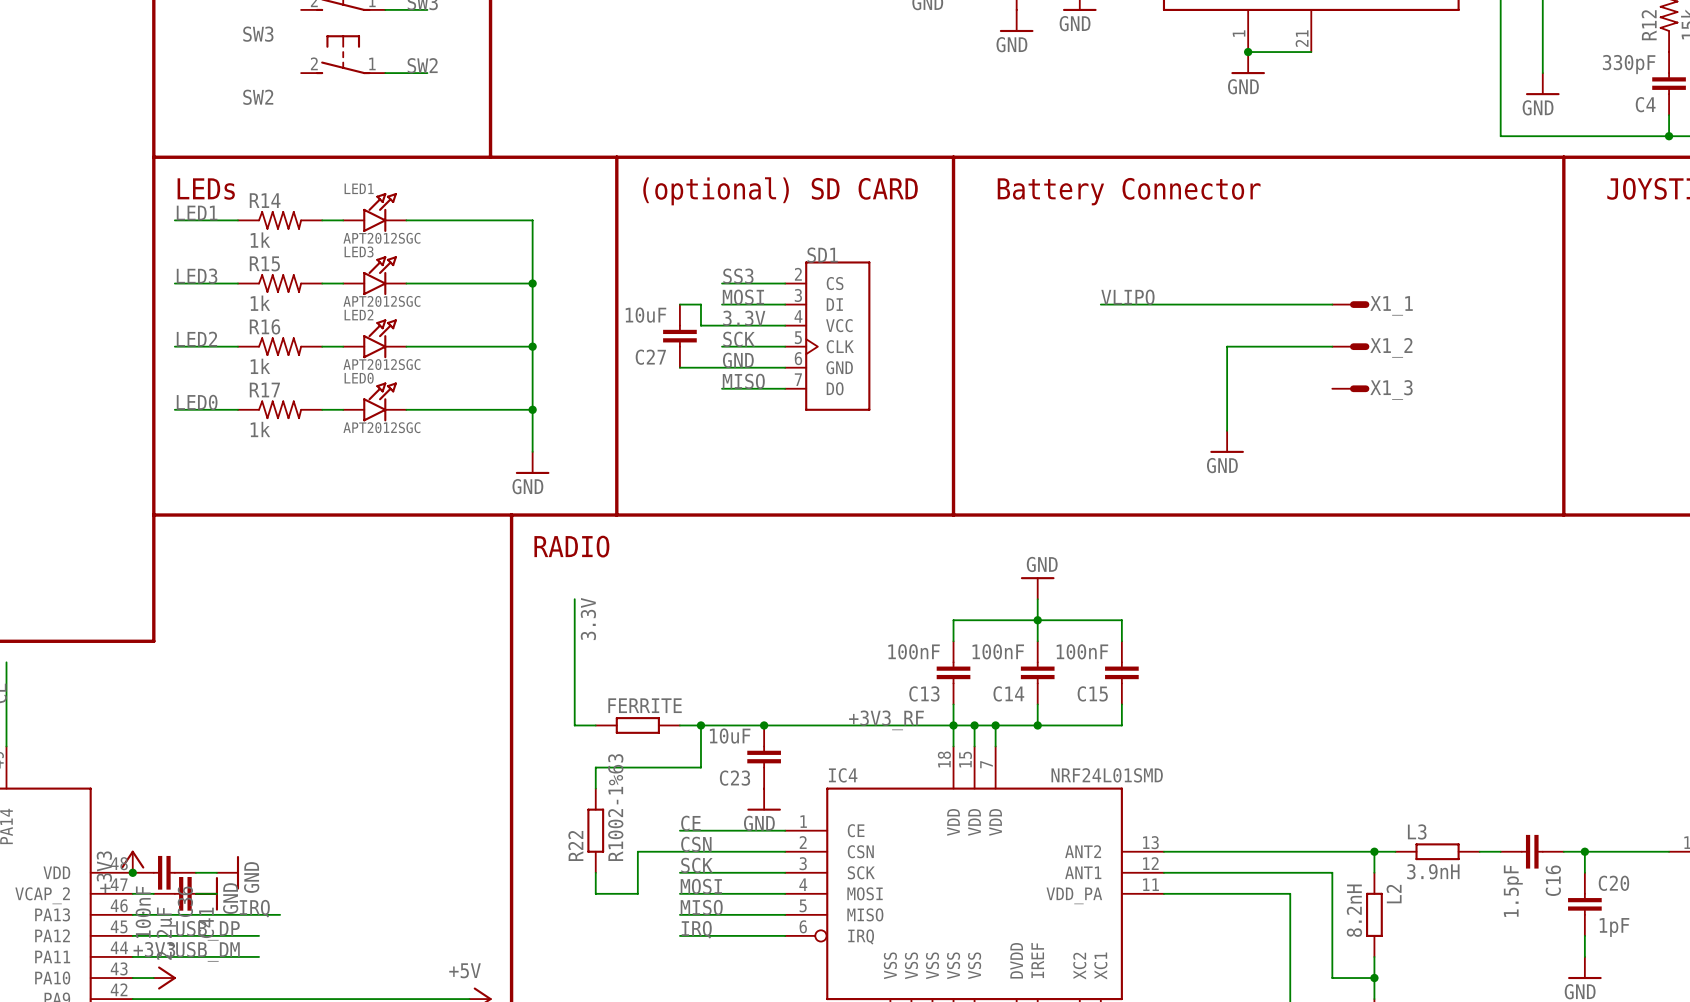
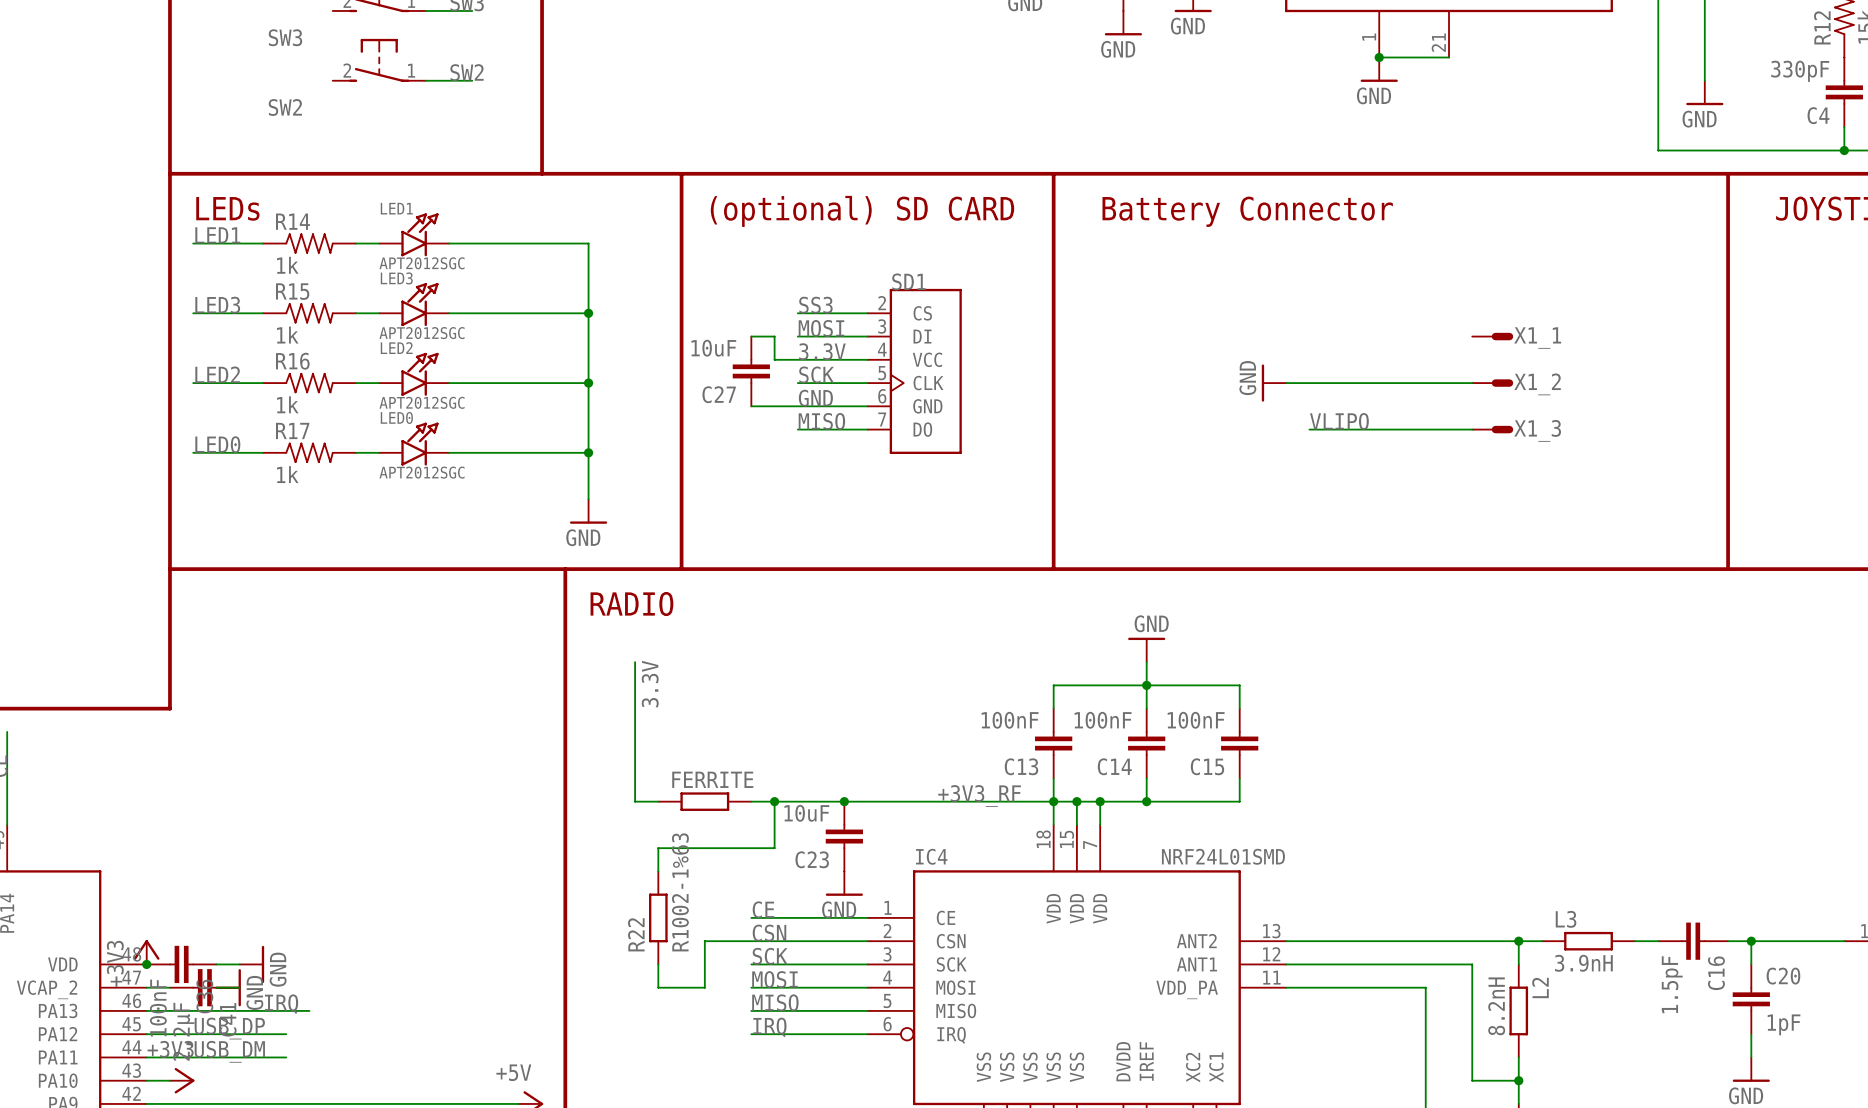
label position: VLIPO (1127, 297) -> VLIPO (1339, 421)
wire: (1100, 304) (1332, 304) -> none
wire: (1227, 346) (1227, 430) -> (1355, 383) (1286, 383)
wire: none -> (1309, 429) (1472, 429)
power symbol position: GND (1227, 441) -> GND (1274, 383)
power symbol rotation: 0° (1227, 451) -> 90° clockwise (1262, 383)

